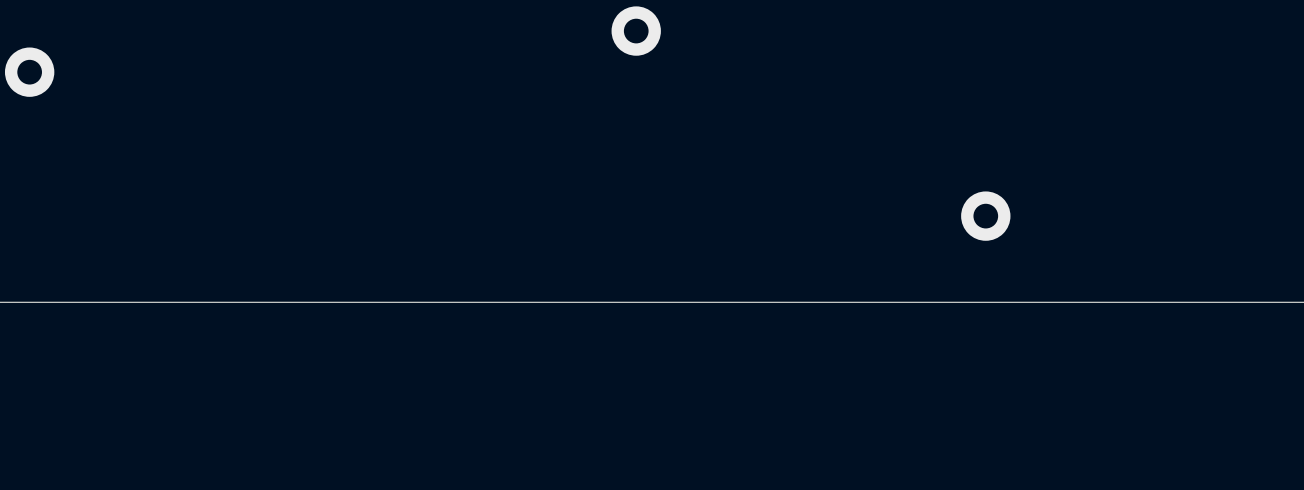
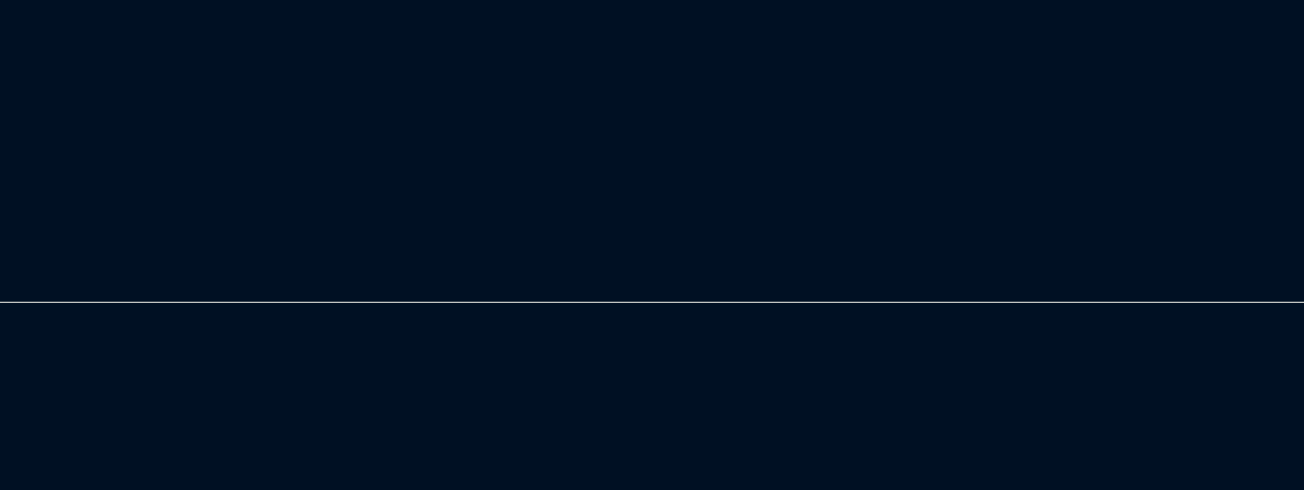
via: (636, 31) -> none
via: (29, 72) -> none
via: (985, 216) -> none

